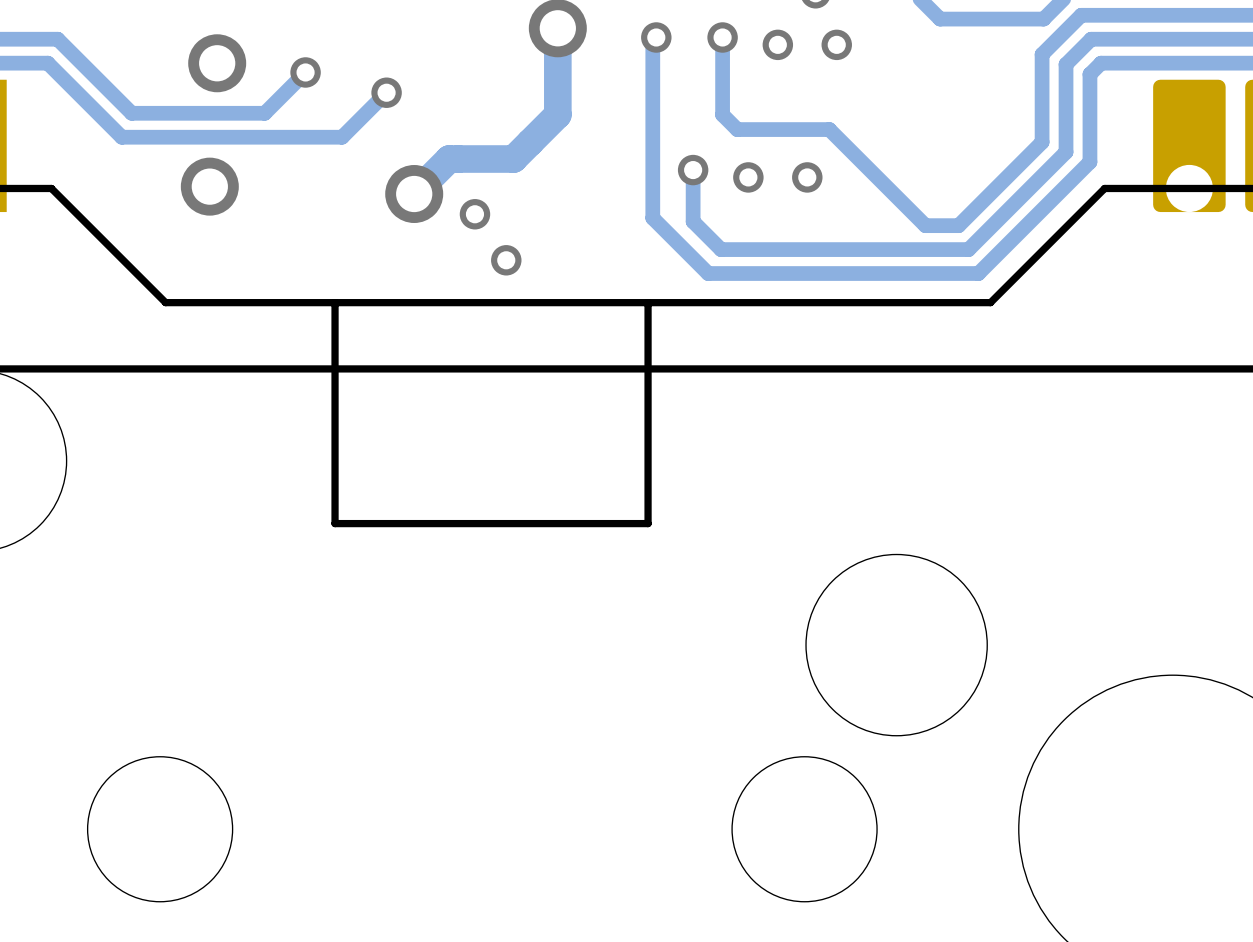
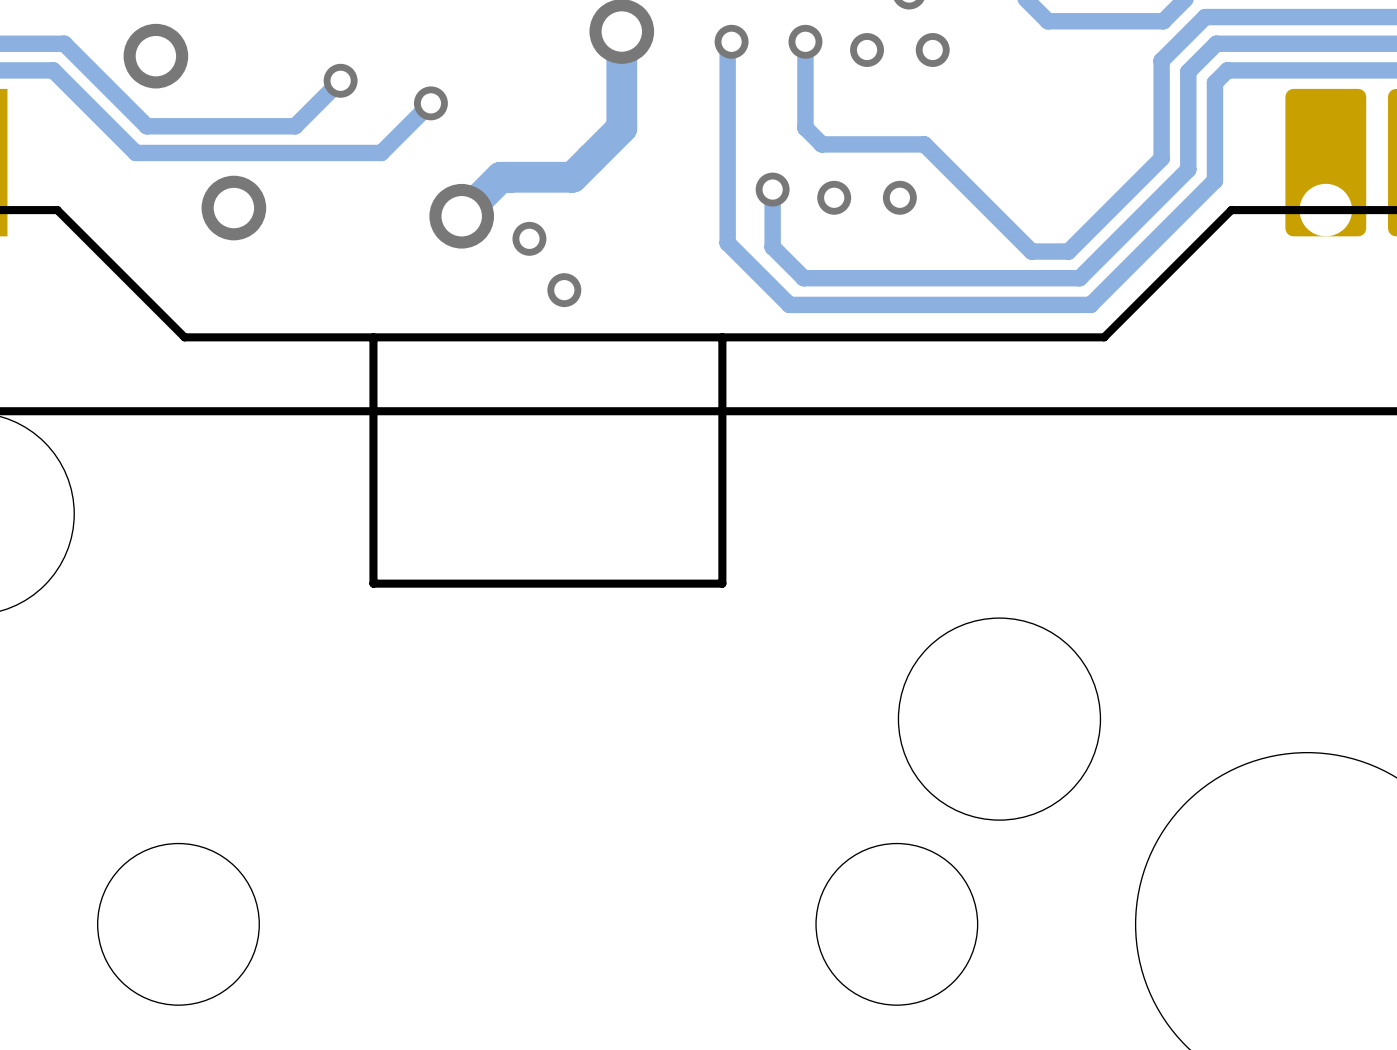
via position: (217, 63) -> (155, 56)

